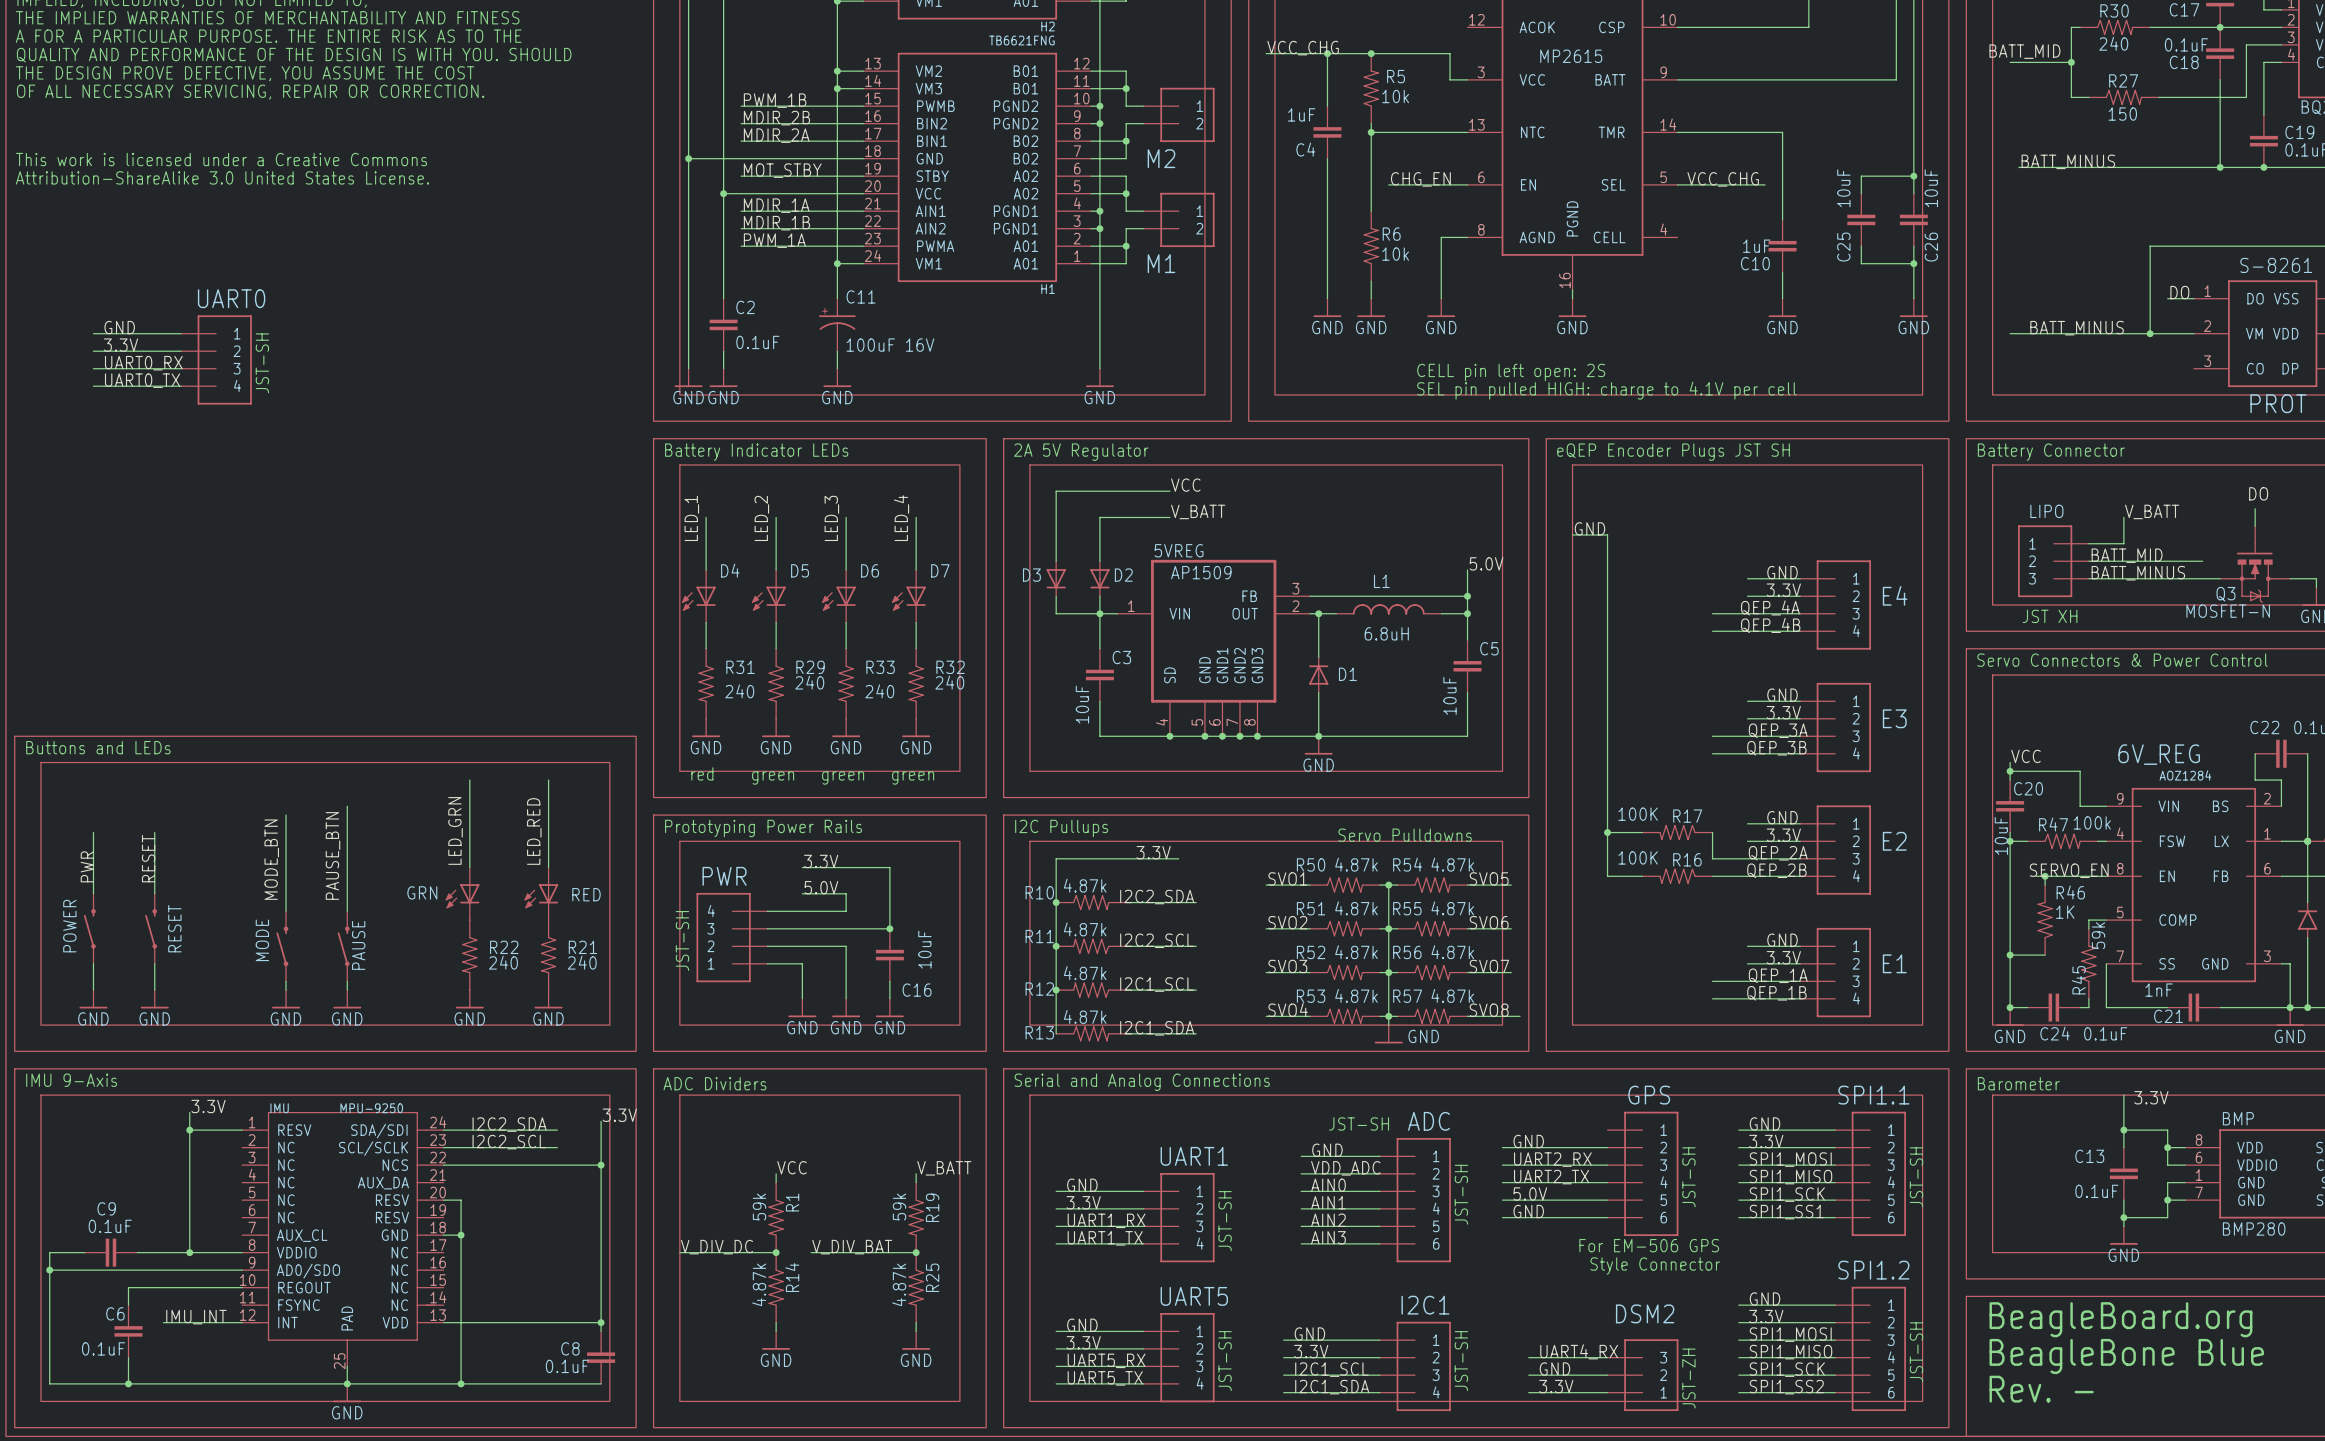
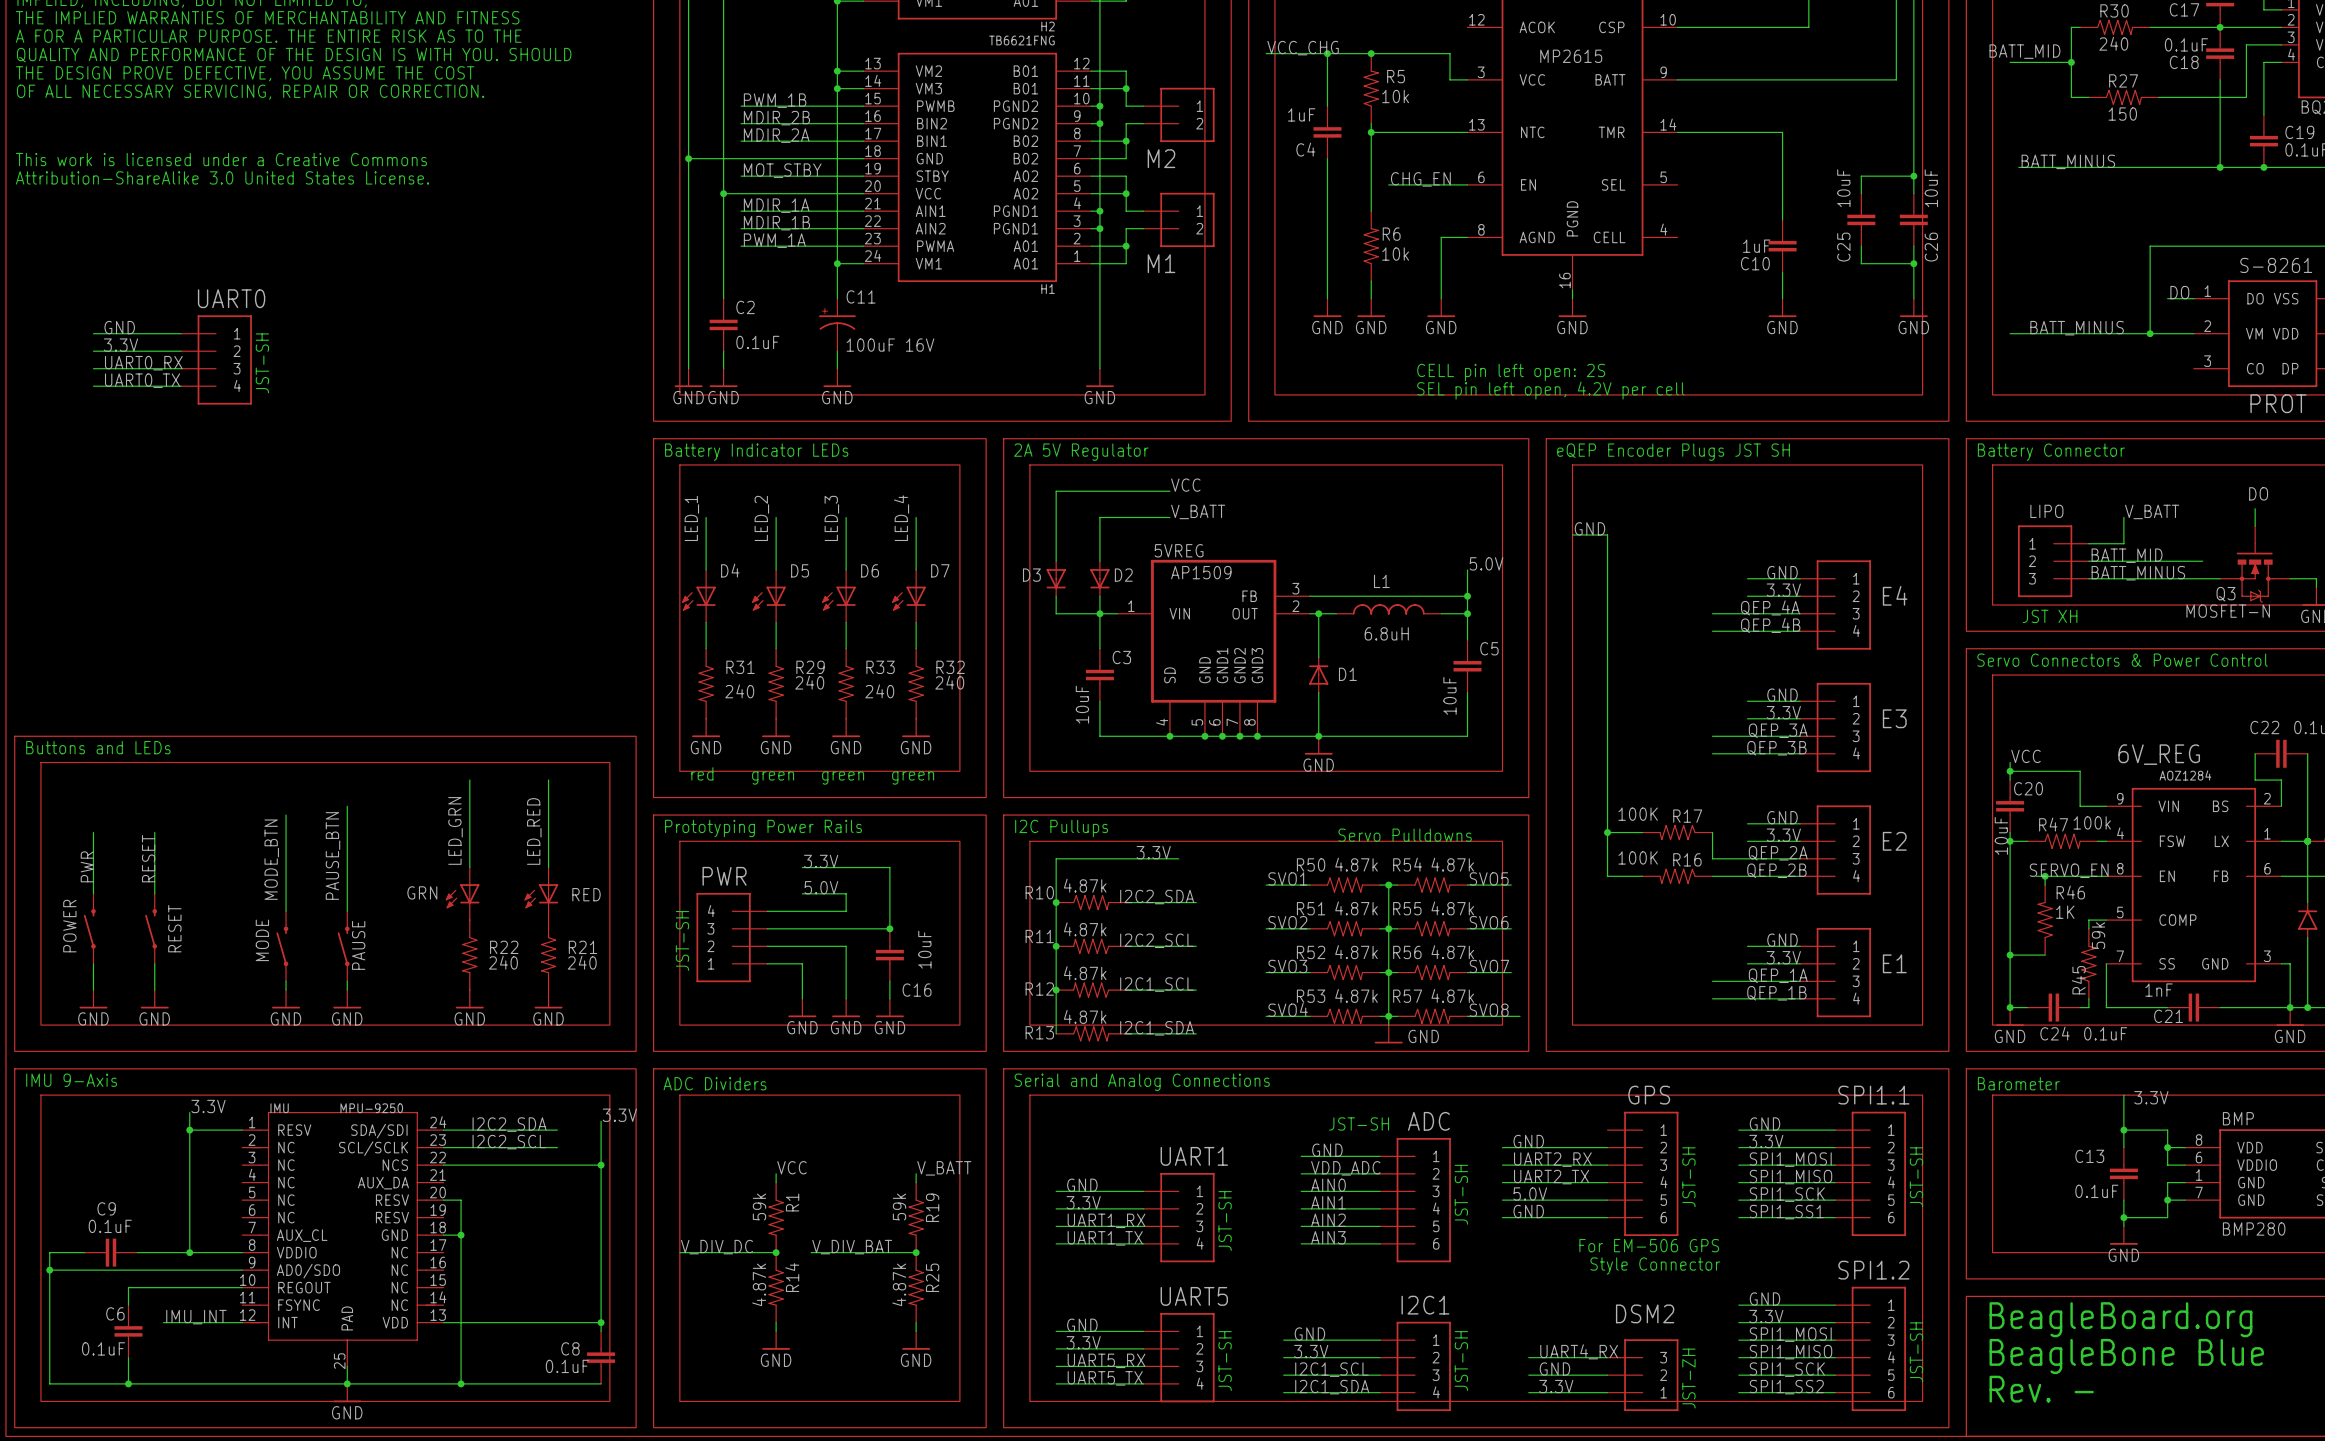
label: VCC_CHG (1723, 179) -> none
wire: (1677, 184) (1765, 184) -> none
text: SEL pin pulled HIGH: charge to 4.1V per cell (1606, 390) -> SEL pin left open, 4.2V per cell (1550, 390)

